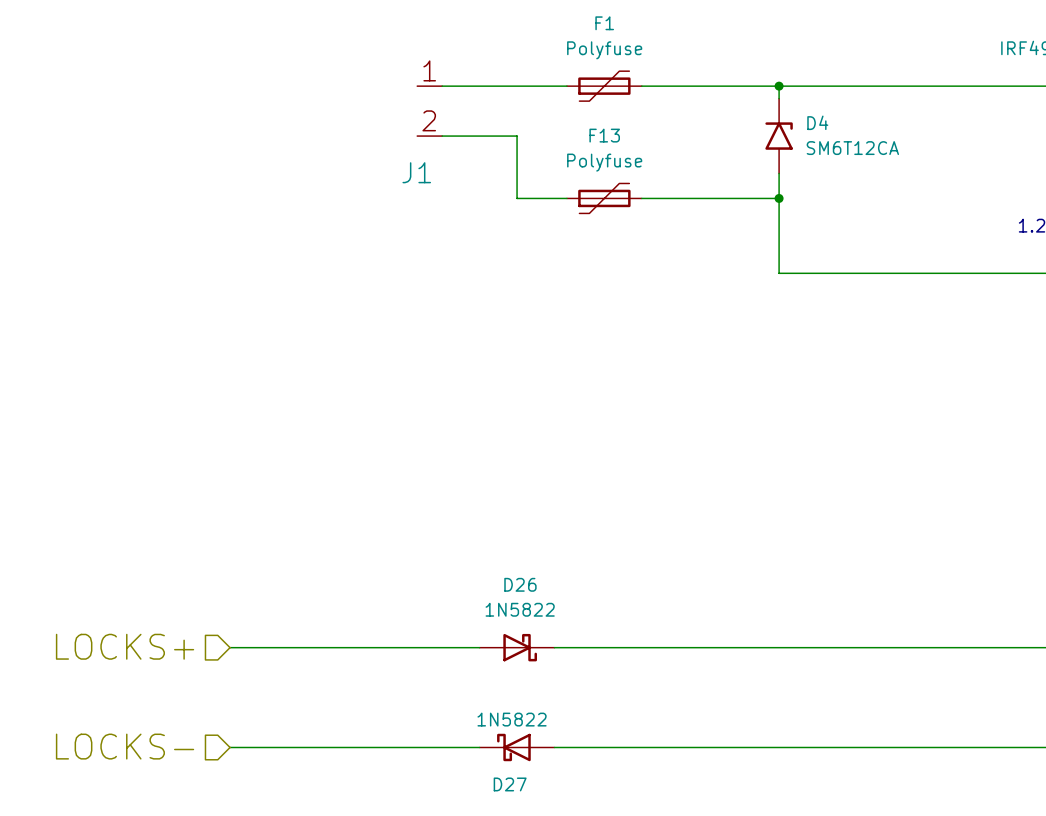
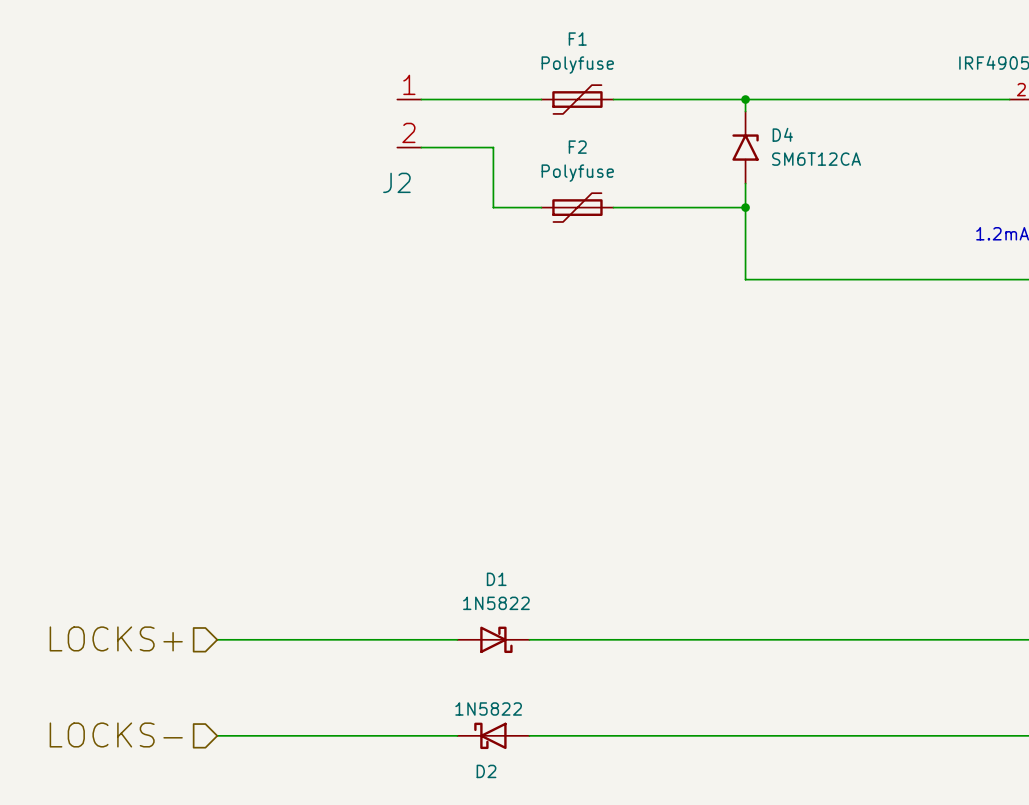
F13 name: F13 (604, 135) -> F2 (577, 147)
J1 name: J1 (416, 172) -> J2 (396, 182)
D26 name: D26 (520, 584) -> D1 (496, 579)
D27 name: D27 (510, 784) -> D2 (486, 771)

